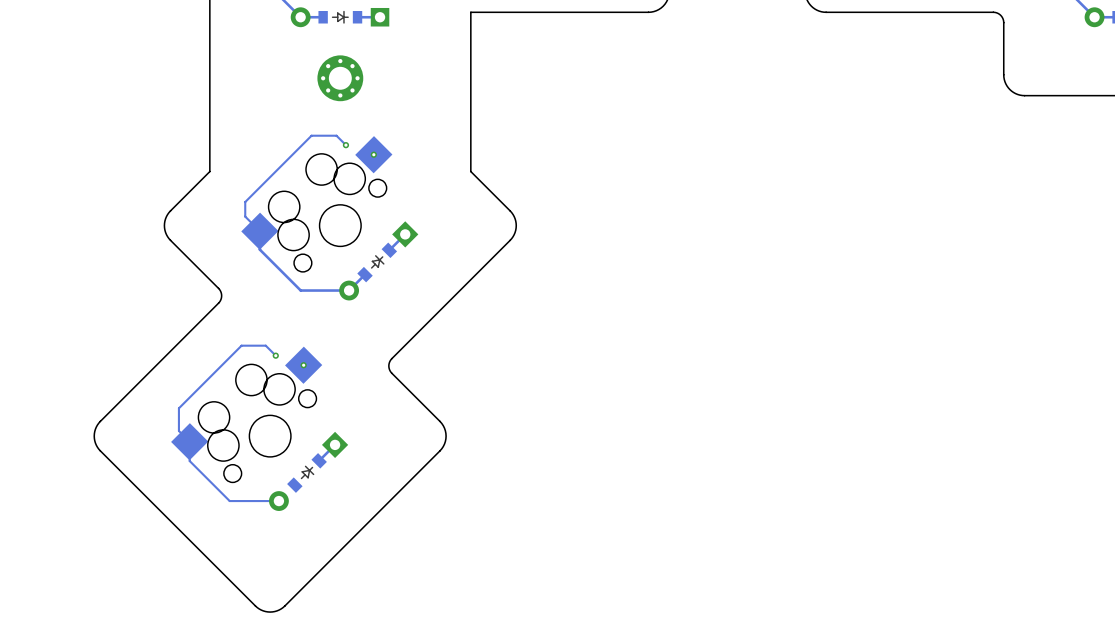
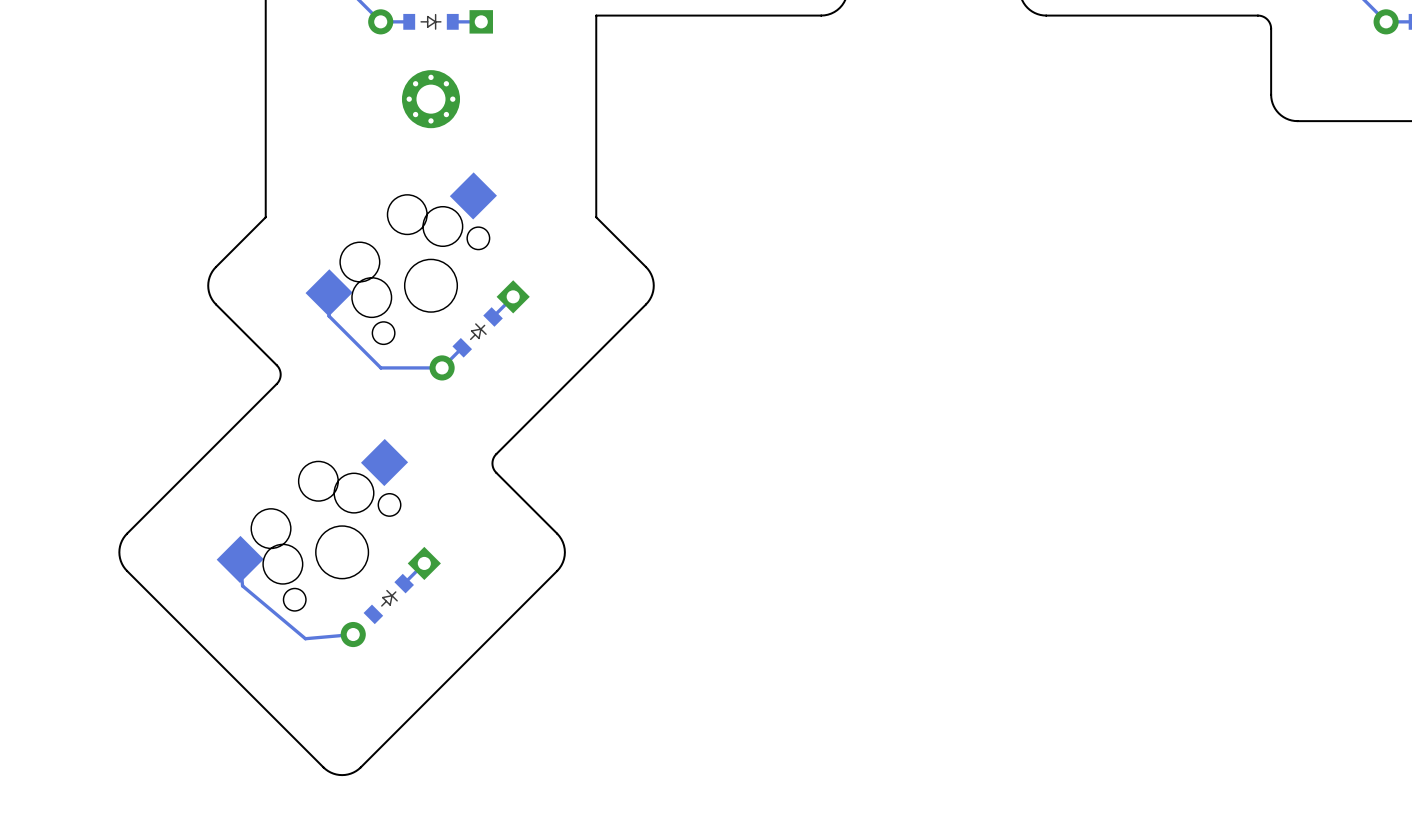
track: (345, 145) (336, 135) (311, 135) (245, 202) (245, 216) (259, 231) -> none
via: (345, 145) -> none
via: (373, 154) -> none
track: (275, 355) (265, 345) (241, 345) (178, 408) (178, 430) (189, 441) (189, 461) (229, 501) (278, 501) -> (240, 559) (242, 585) (305, 638) (353, 634)
via: (275, 355) -> none
via: (303, 365) -> none

